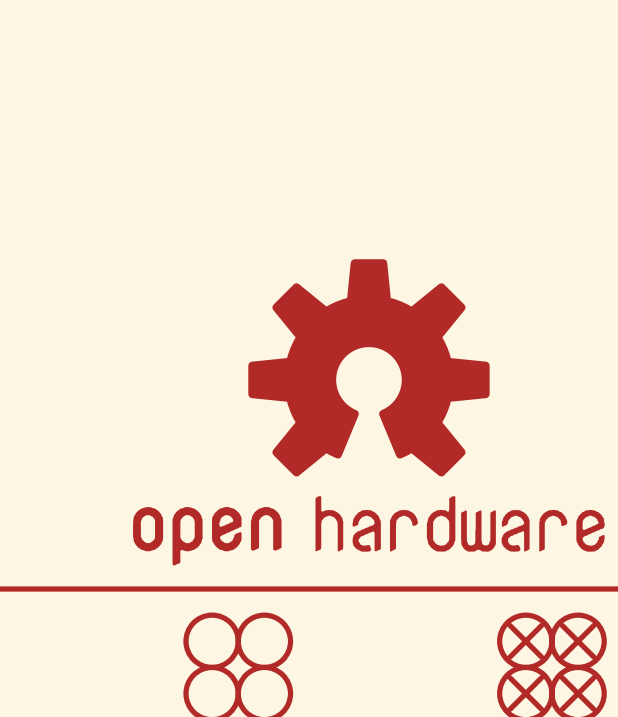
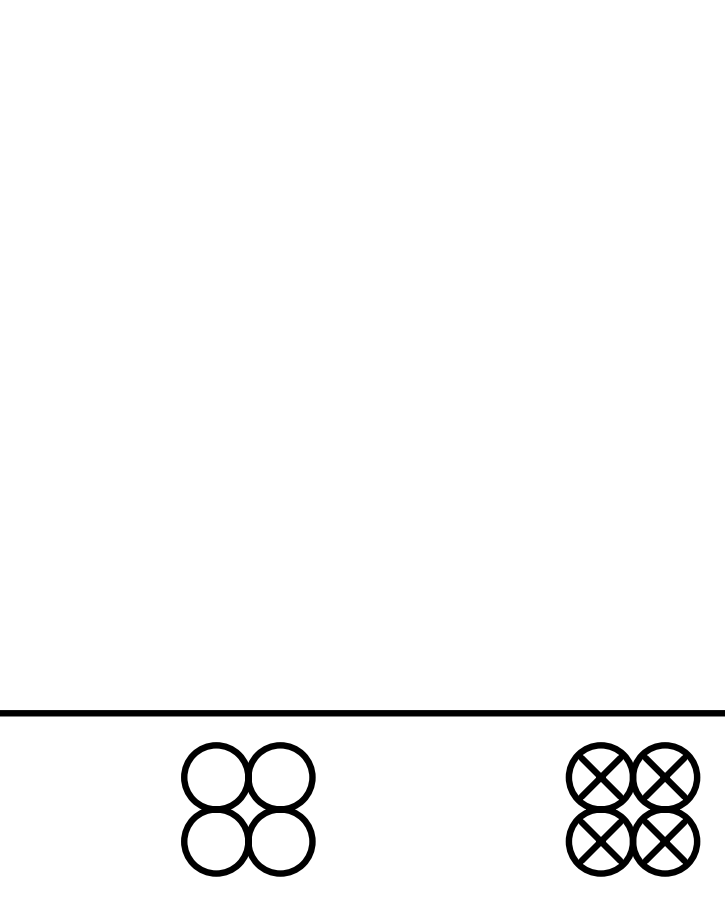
part: (368, 412) -> none

